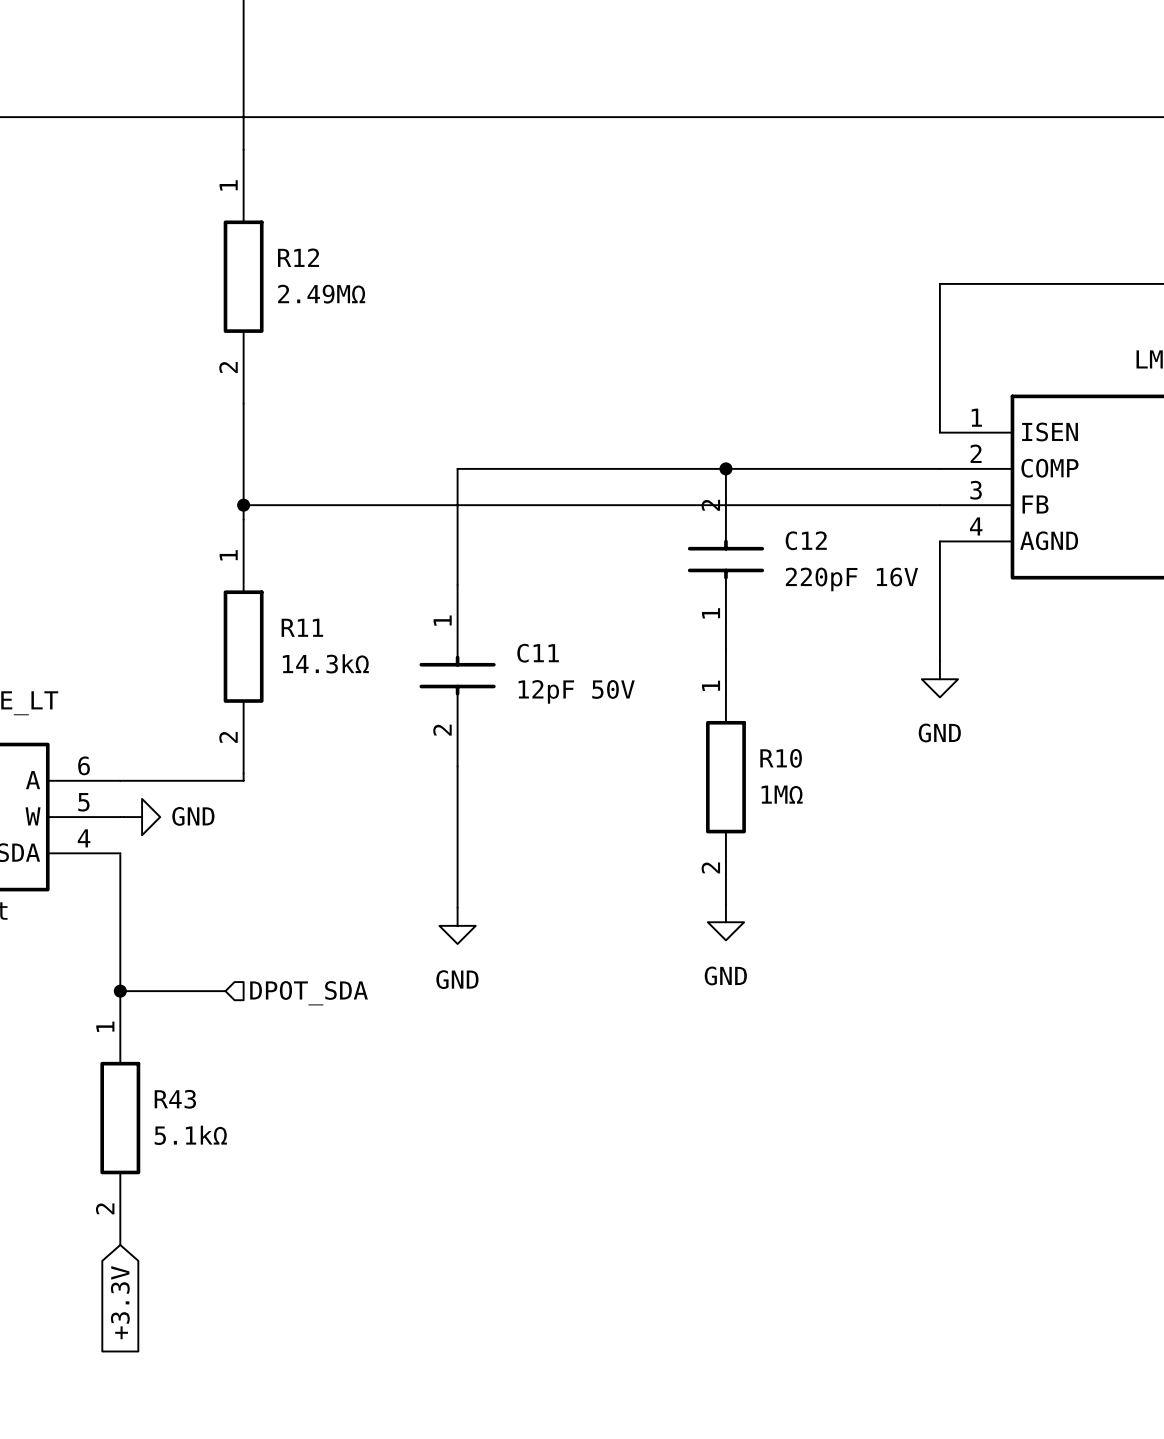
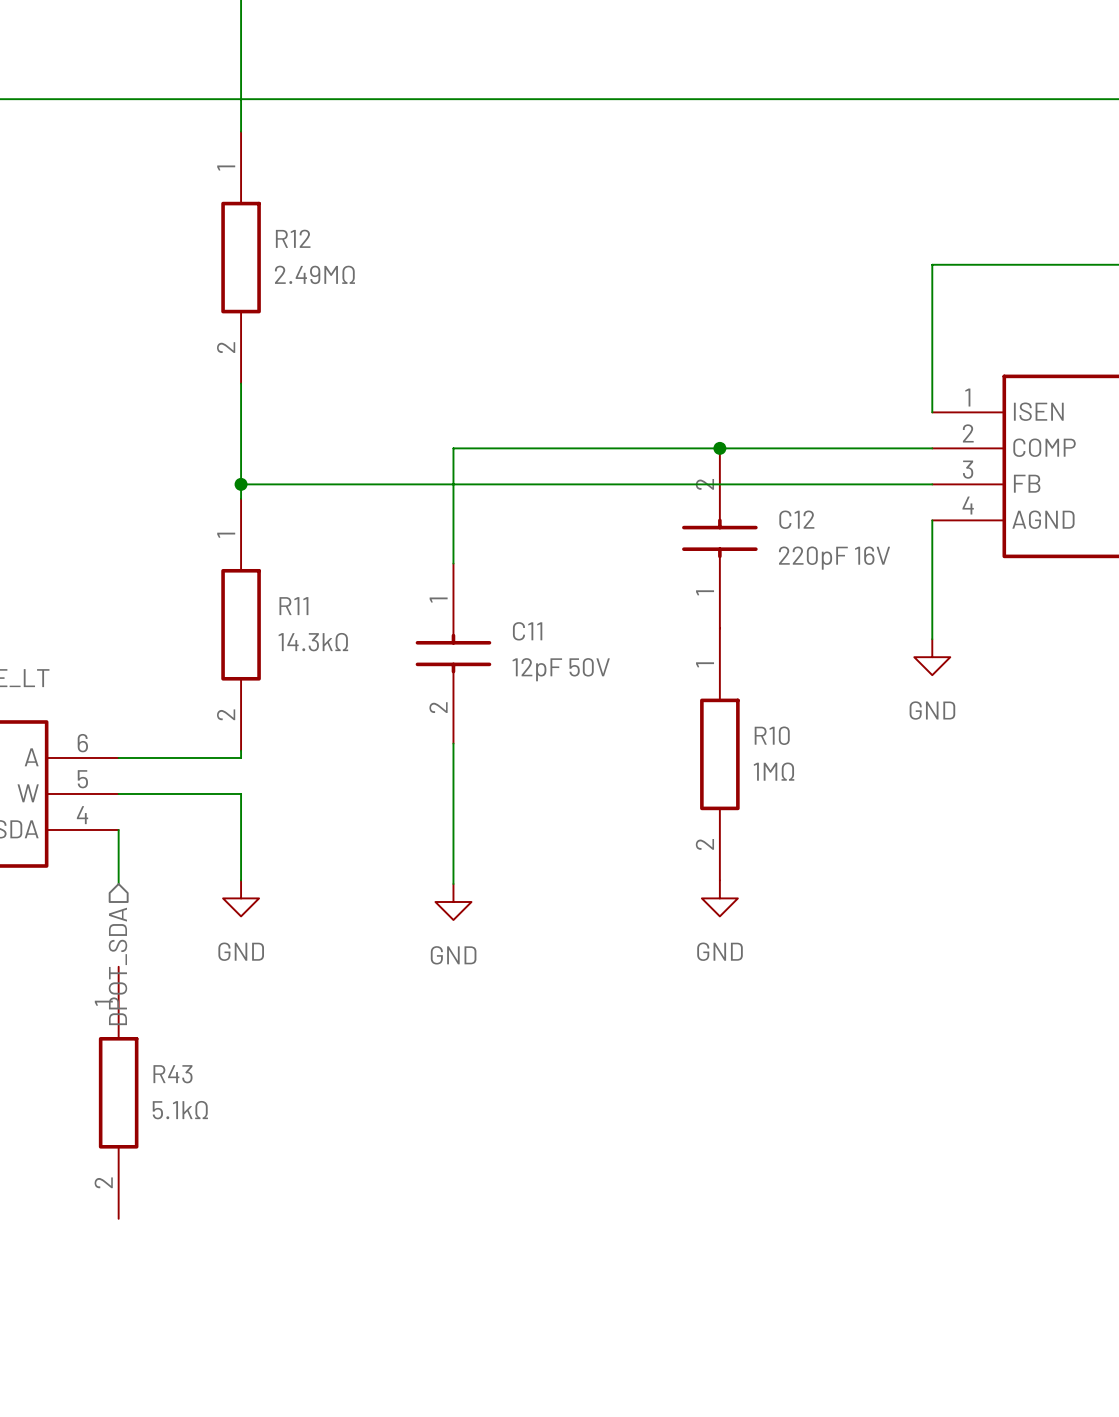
wire: none -> (122, 793) (241, 793) (241, 880)
power symbol rotation: 0° (142, 817) -> 90° clockwise (241, 898)
power symbol position: GND (142, 817) -> GND (241, 898)
wire: (120, 907) (120, 991) (225, 991) -> none
junction: (120, 991) -> none
hierarchical label rotation: 0° (309, 993) -> 90° clockwise (117, 966)
hierarchical label position: DPOT_SDA (309, 993) -> DPOT_SDA (117, 966)
global label: +3.3V (120, 1302) -> none

